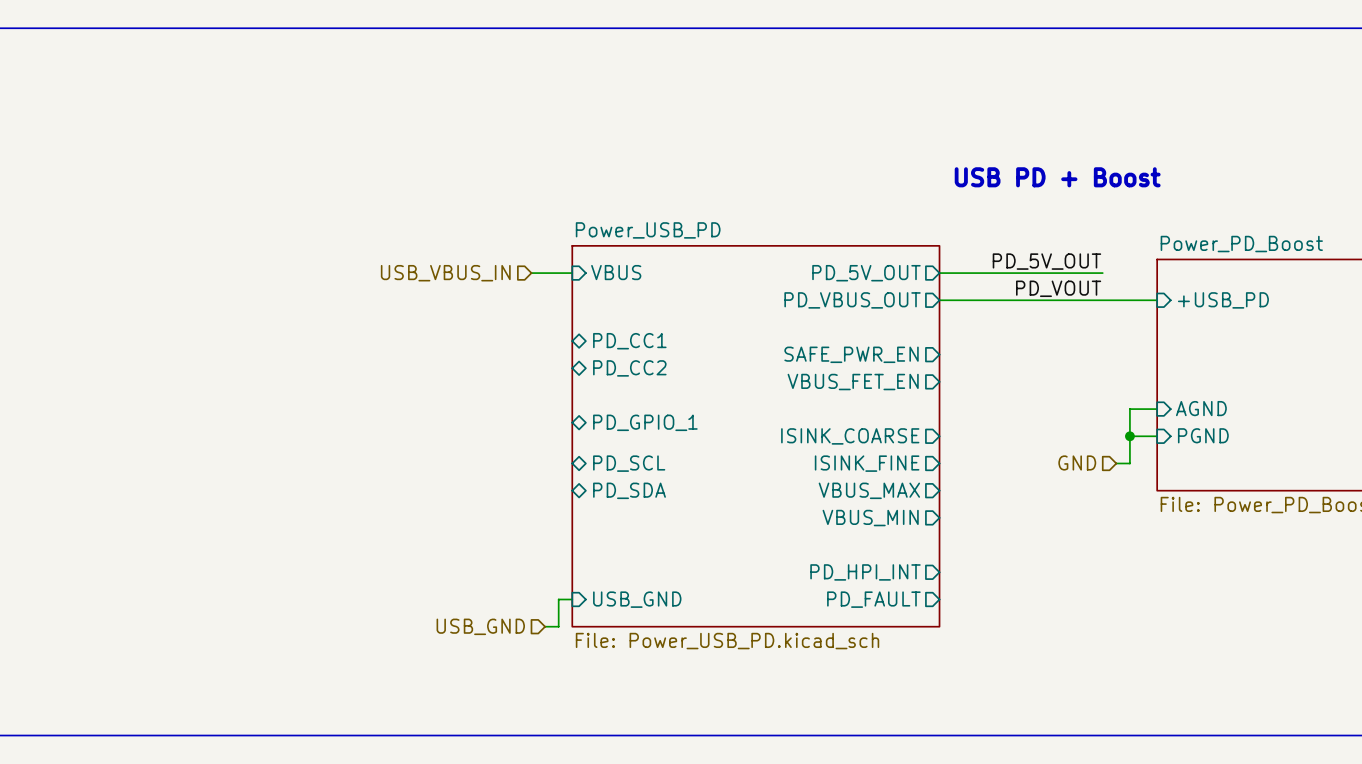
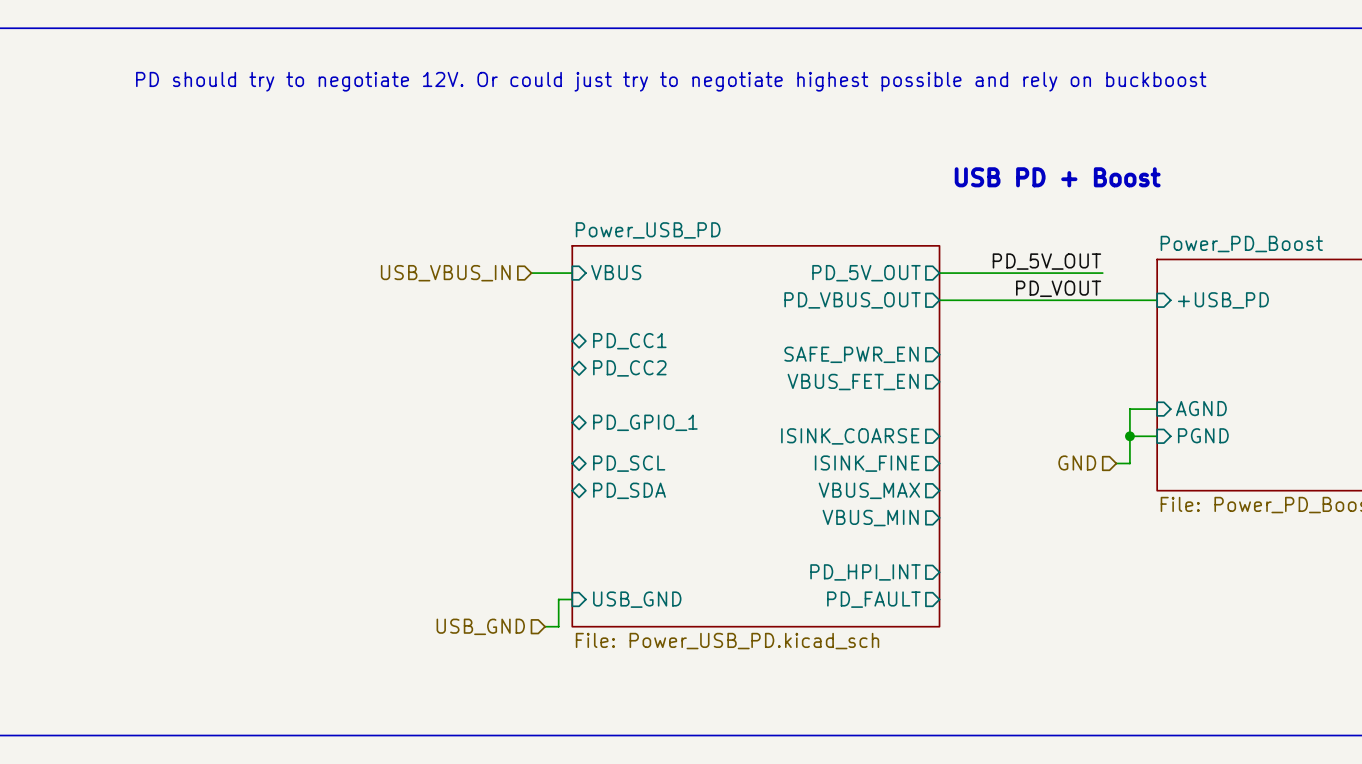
text: none -> PD should try to negotiate 12V. Or could just try to negotiate highest possible and rely on buckboost (671, 81)

